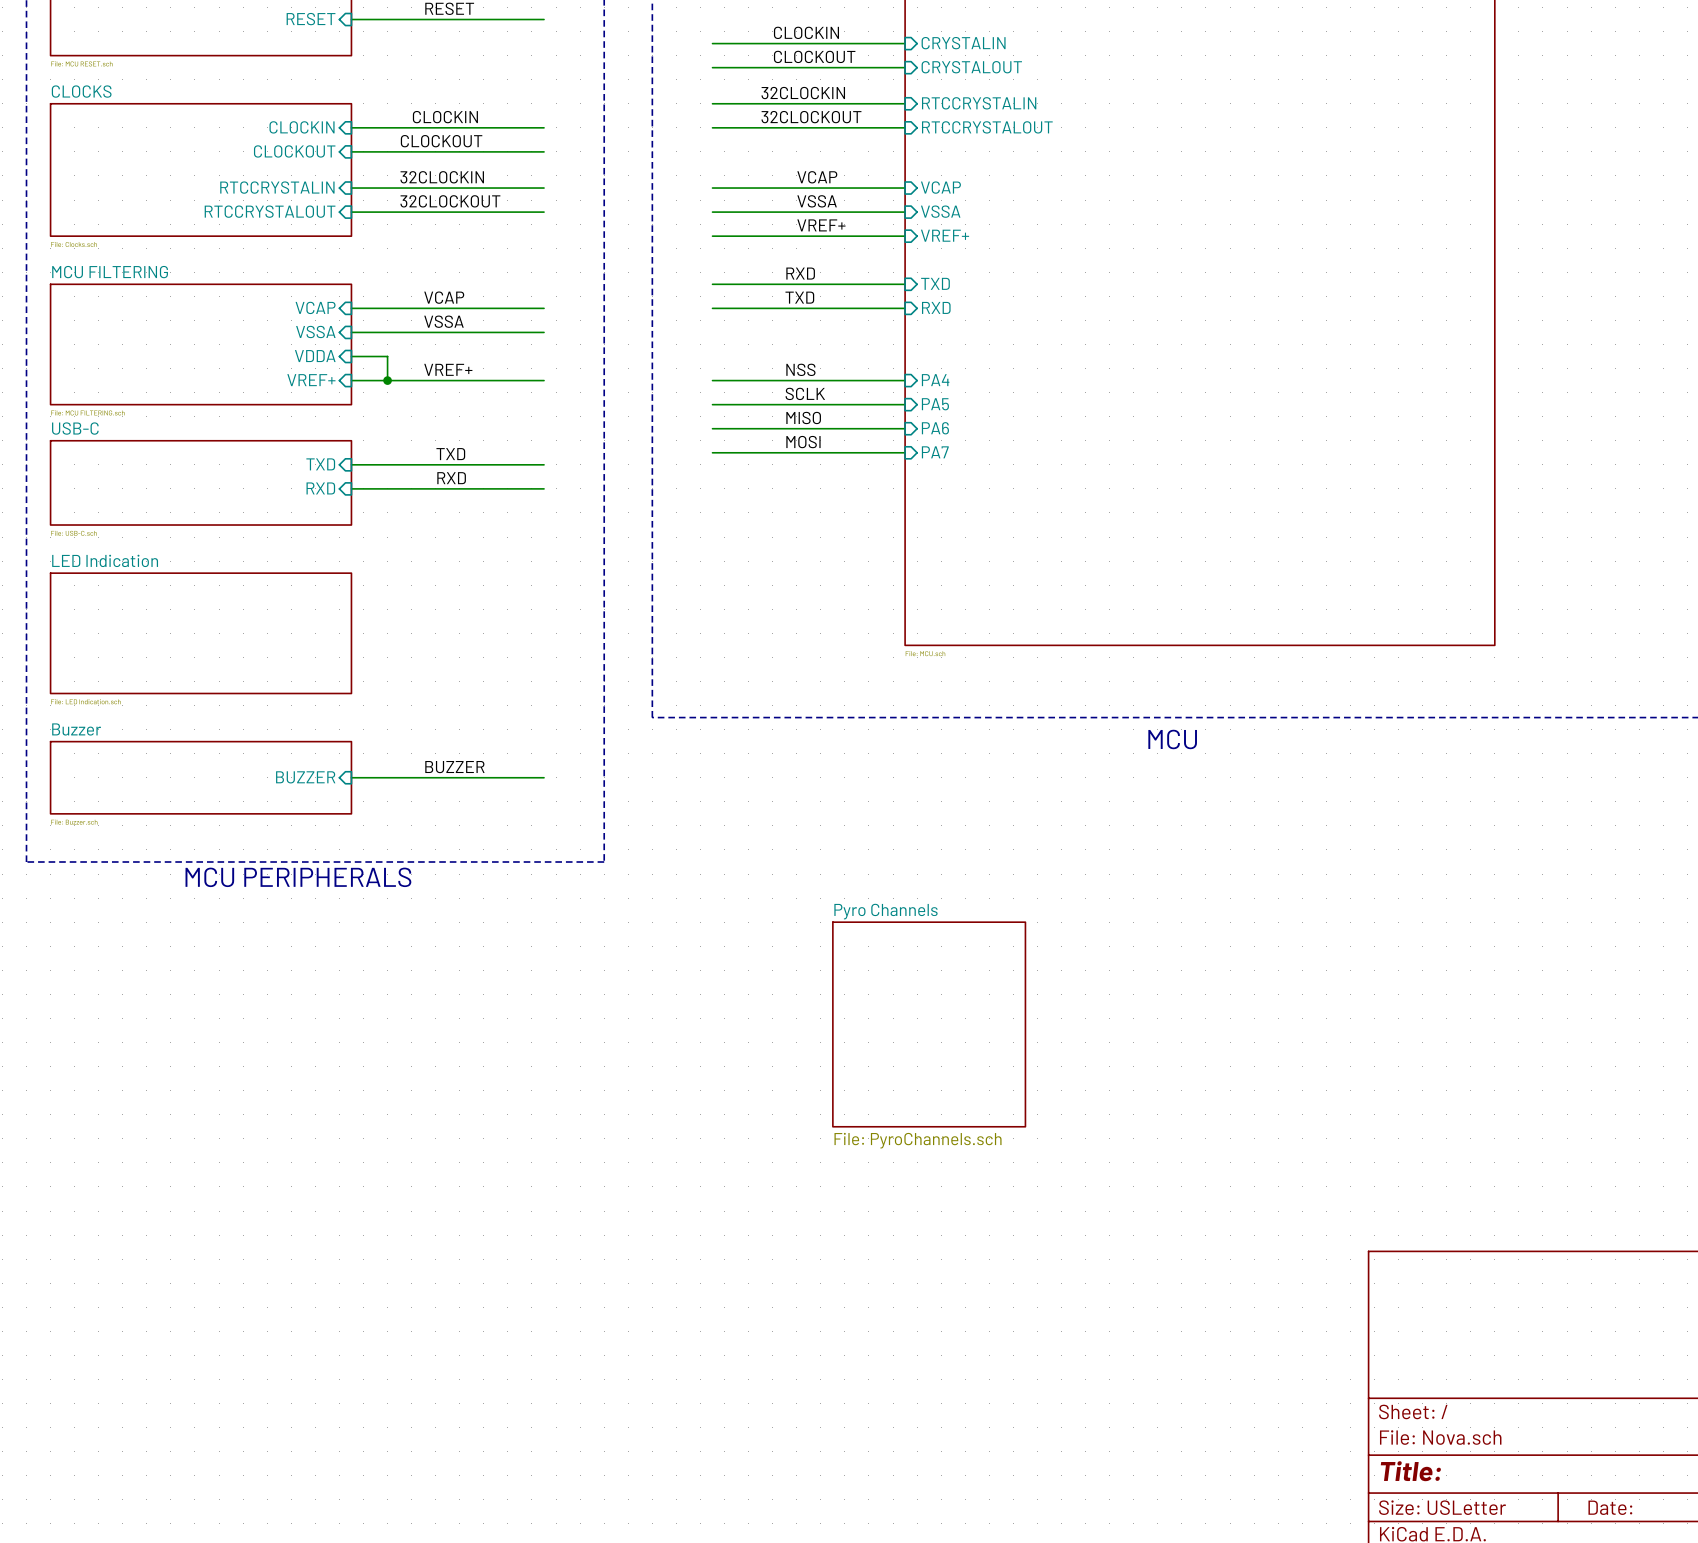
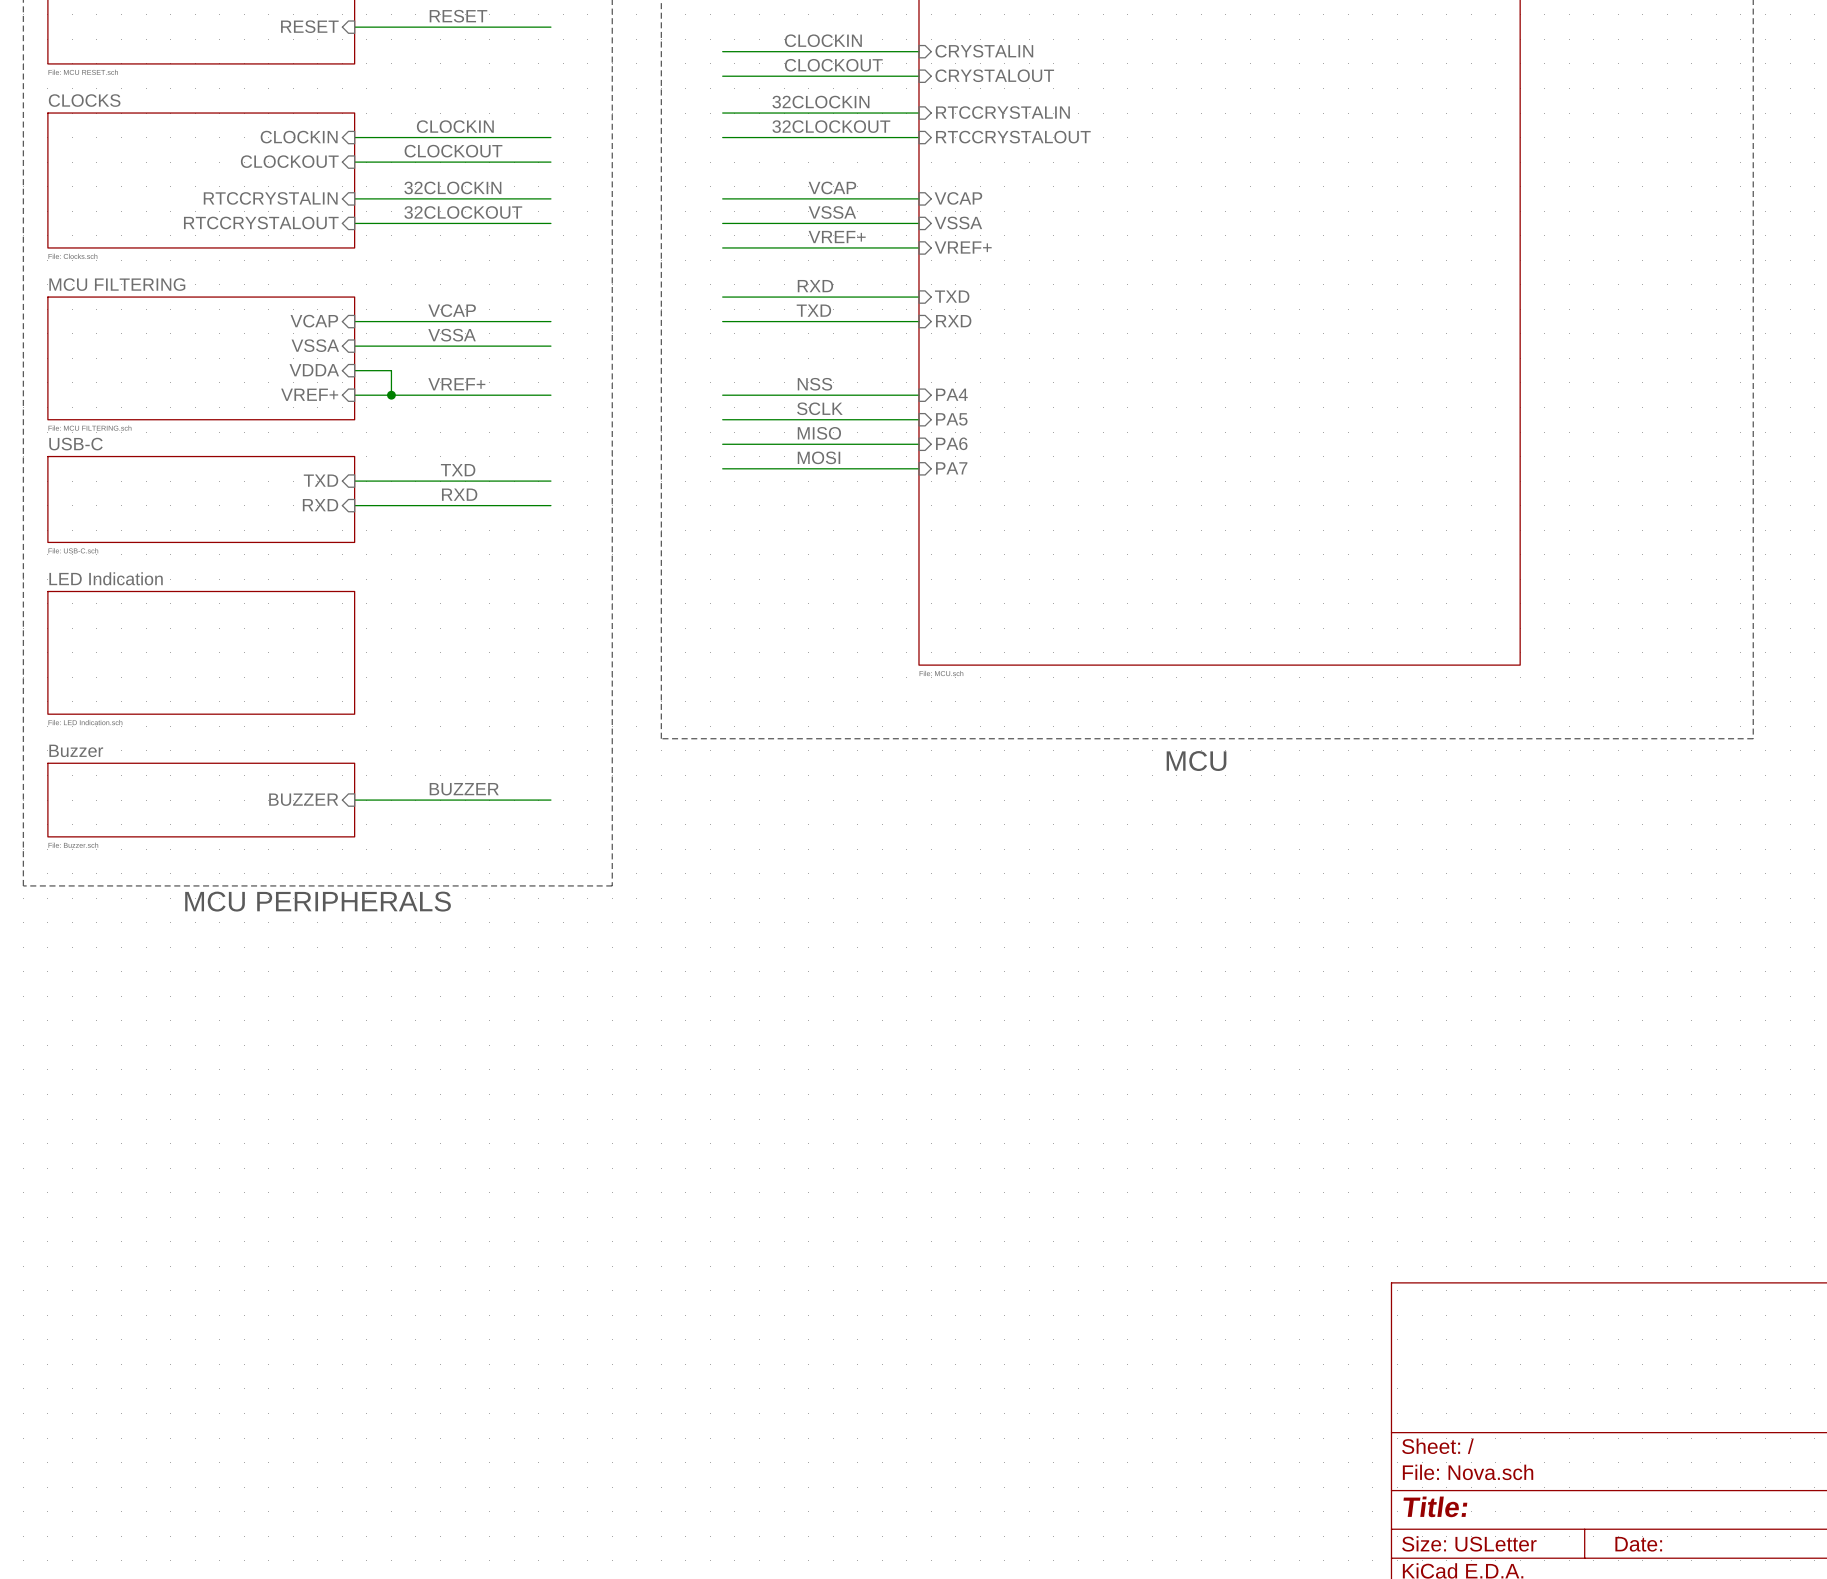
sheet Pyro Channels: File: PyroChannels.sch (929, 1024) -> none

